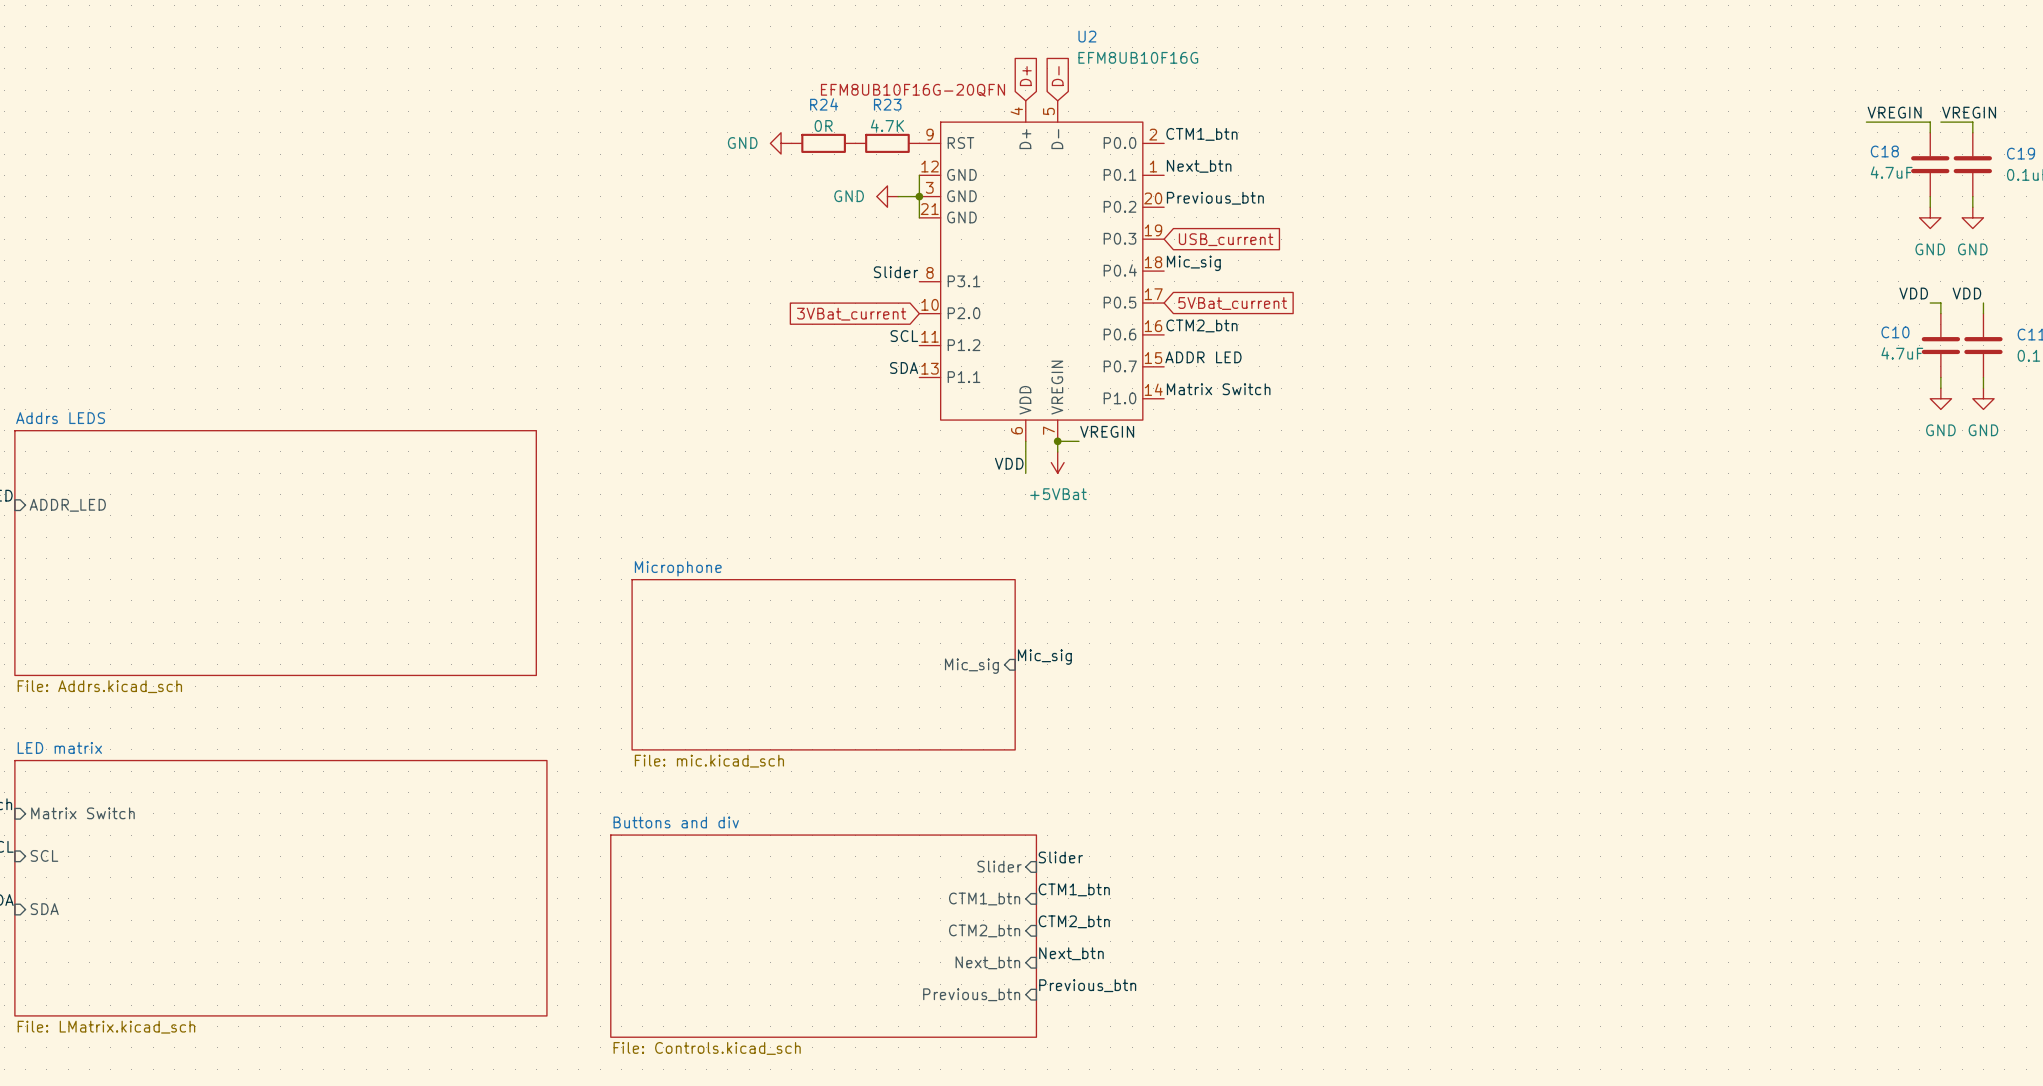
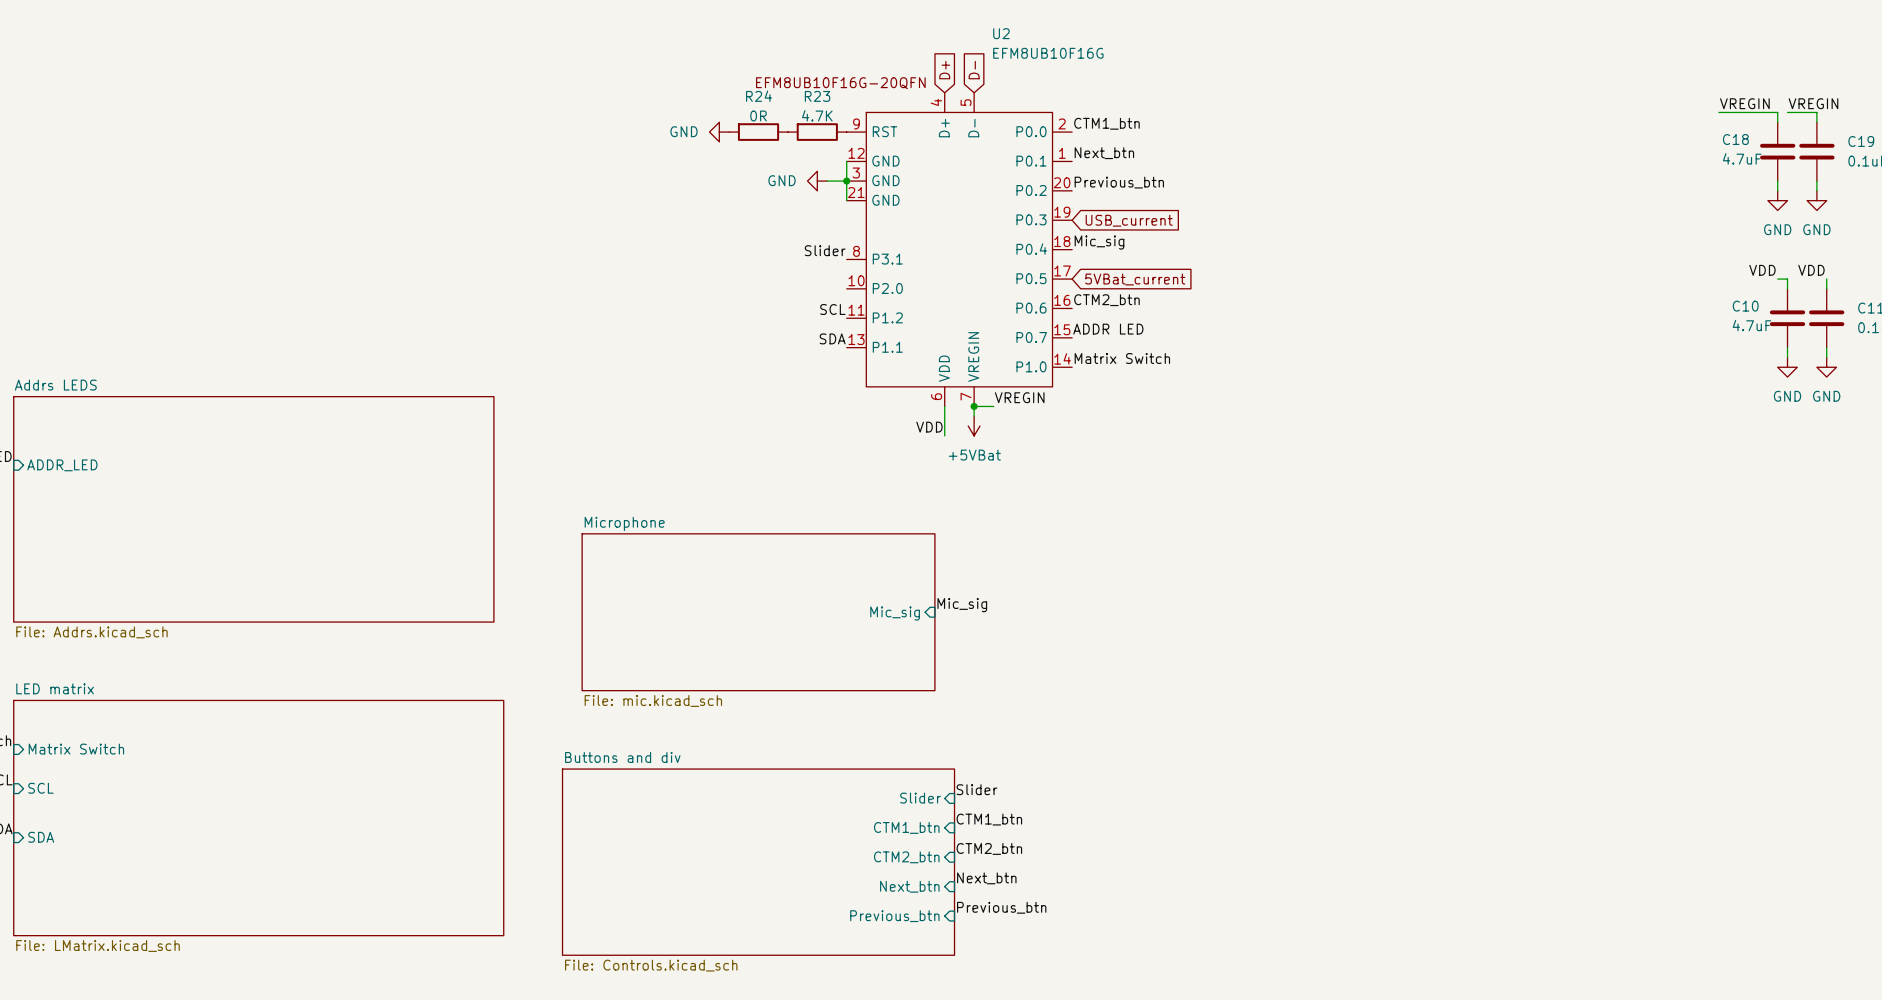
global label: 3VBat_current (851, 314) -> none

